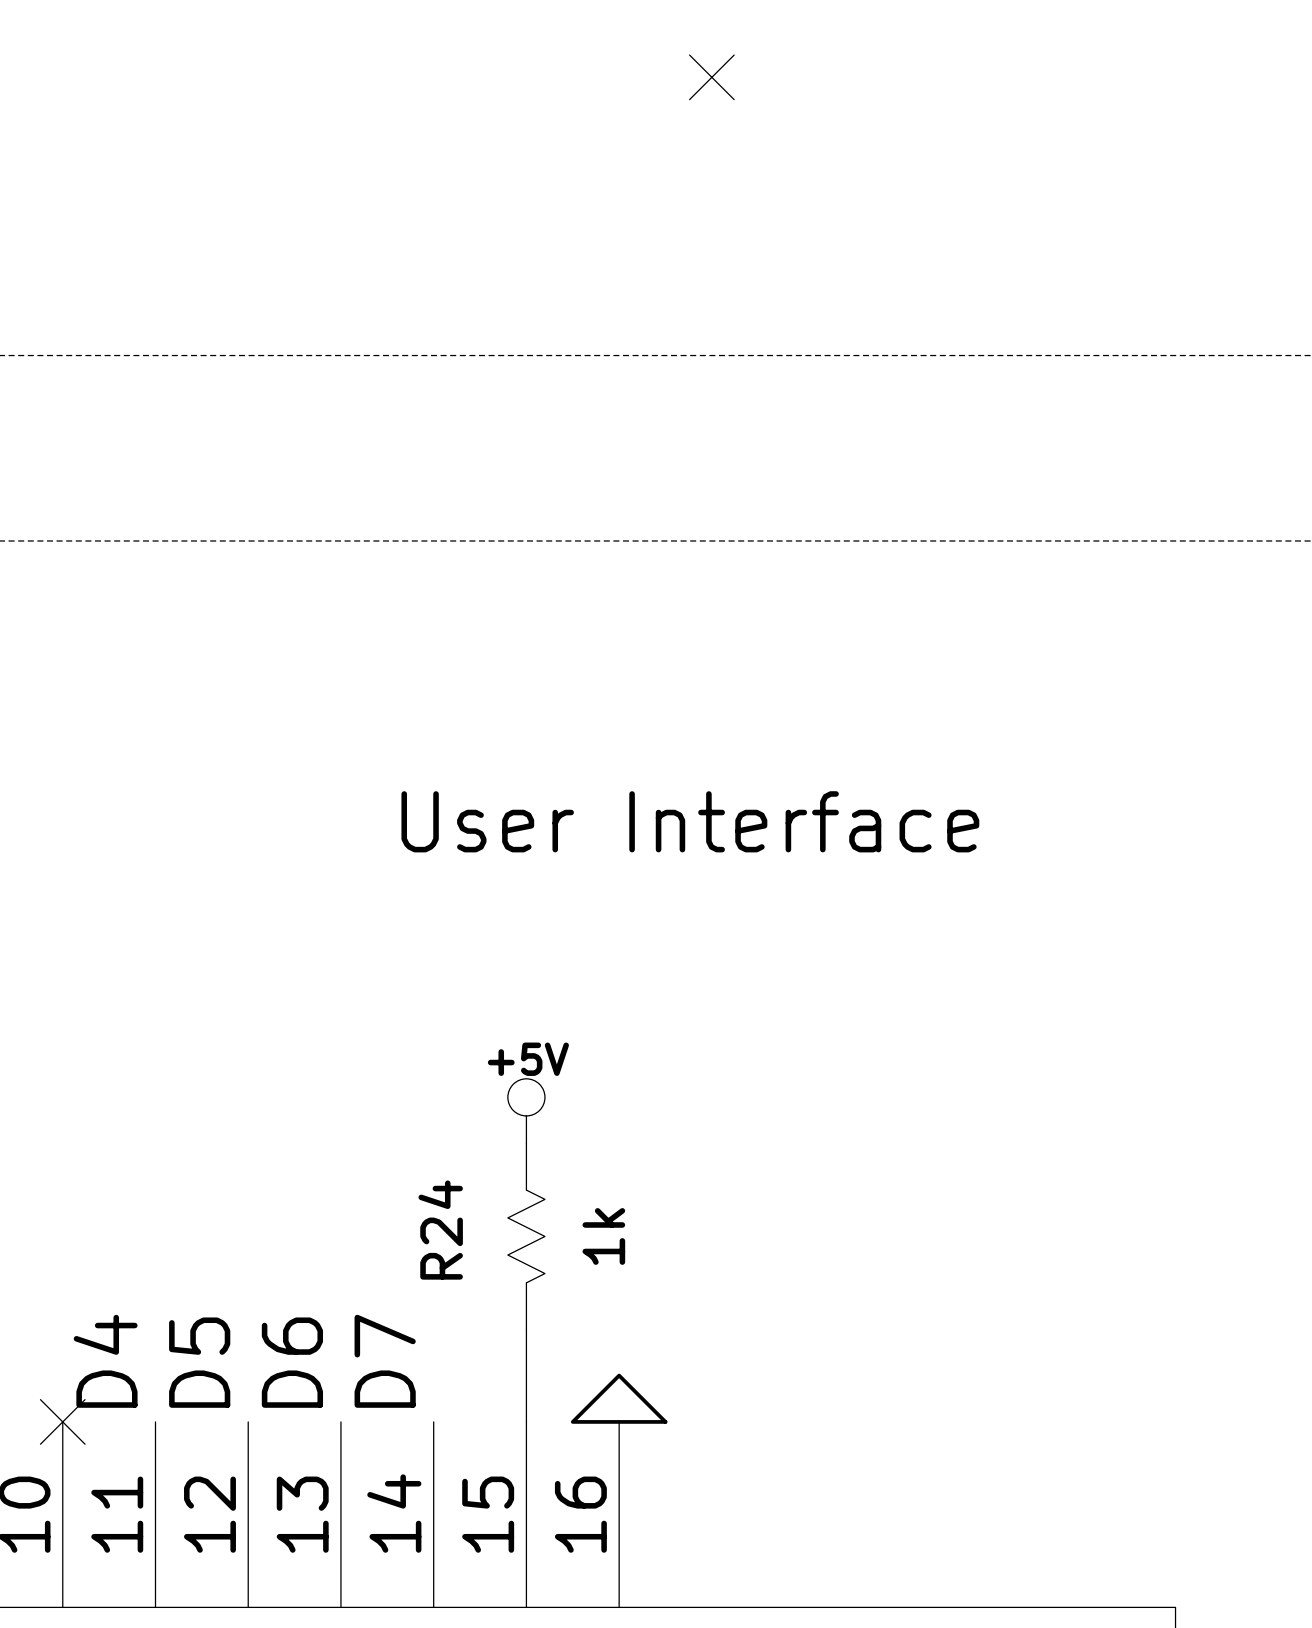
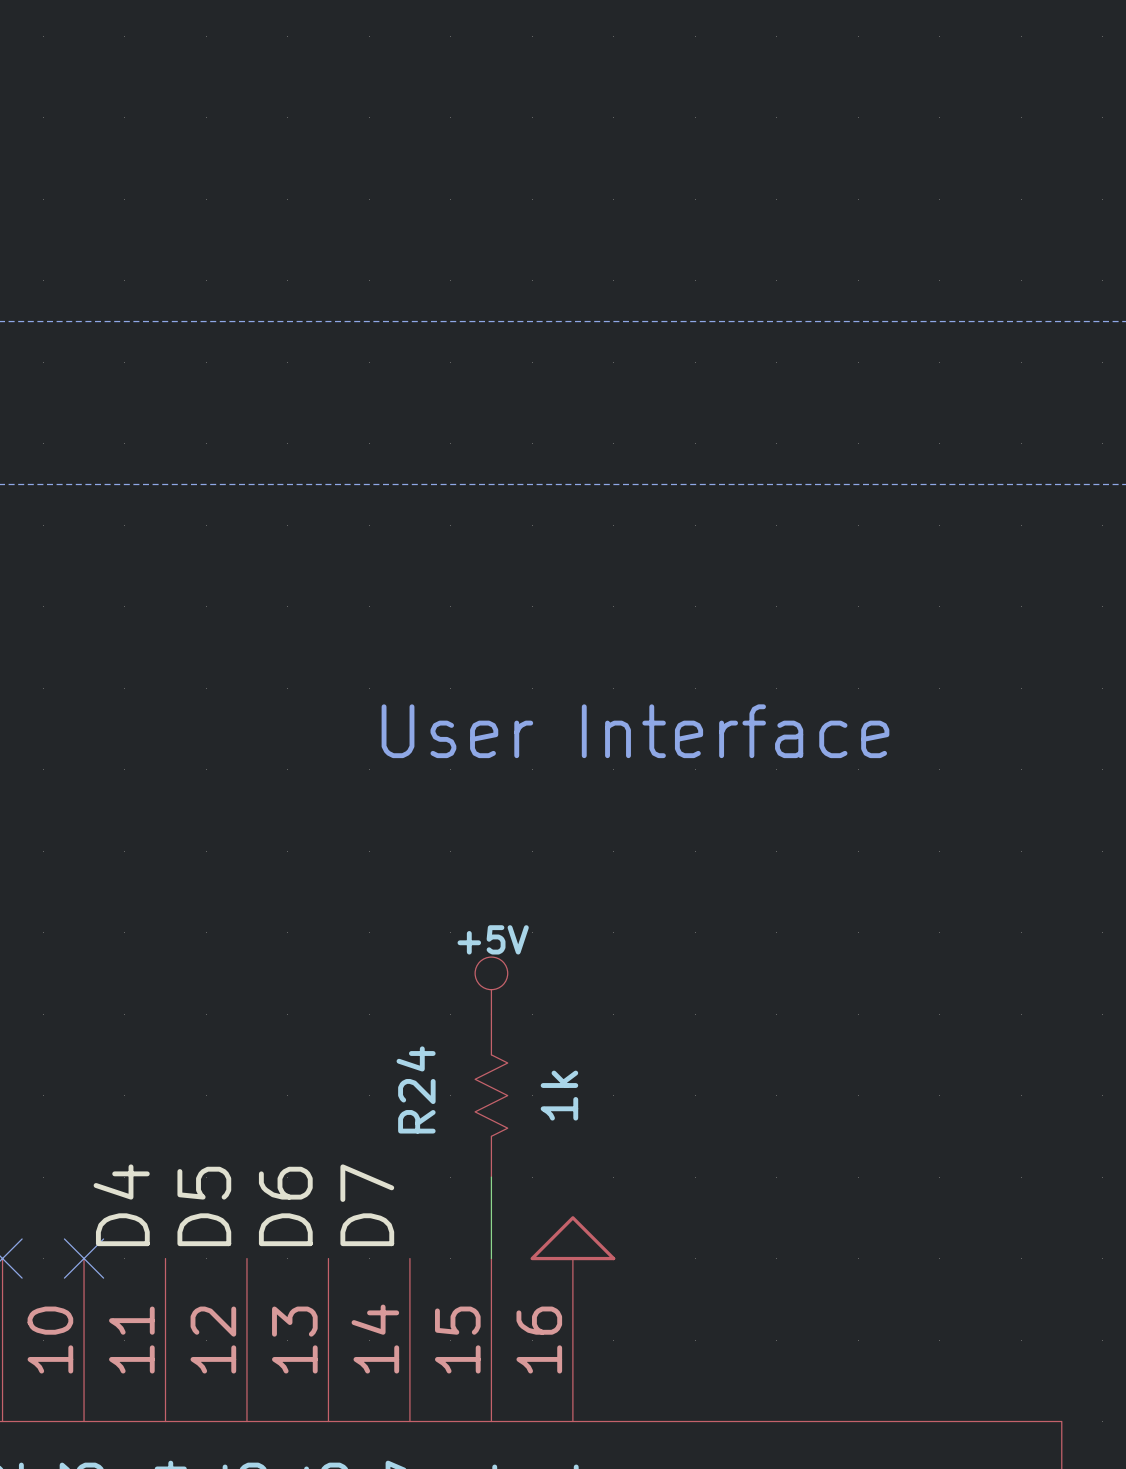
no-connect mark: (711, 77) -> none

